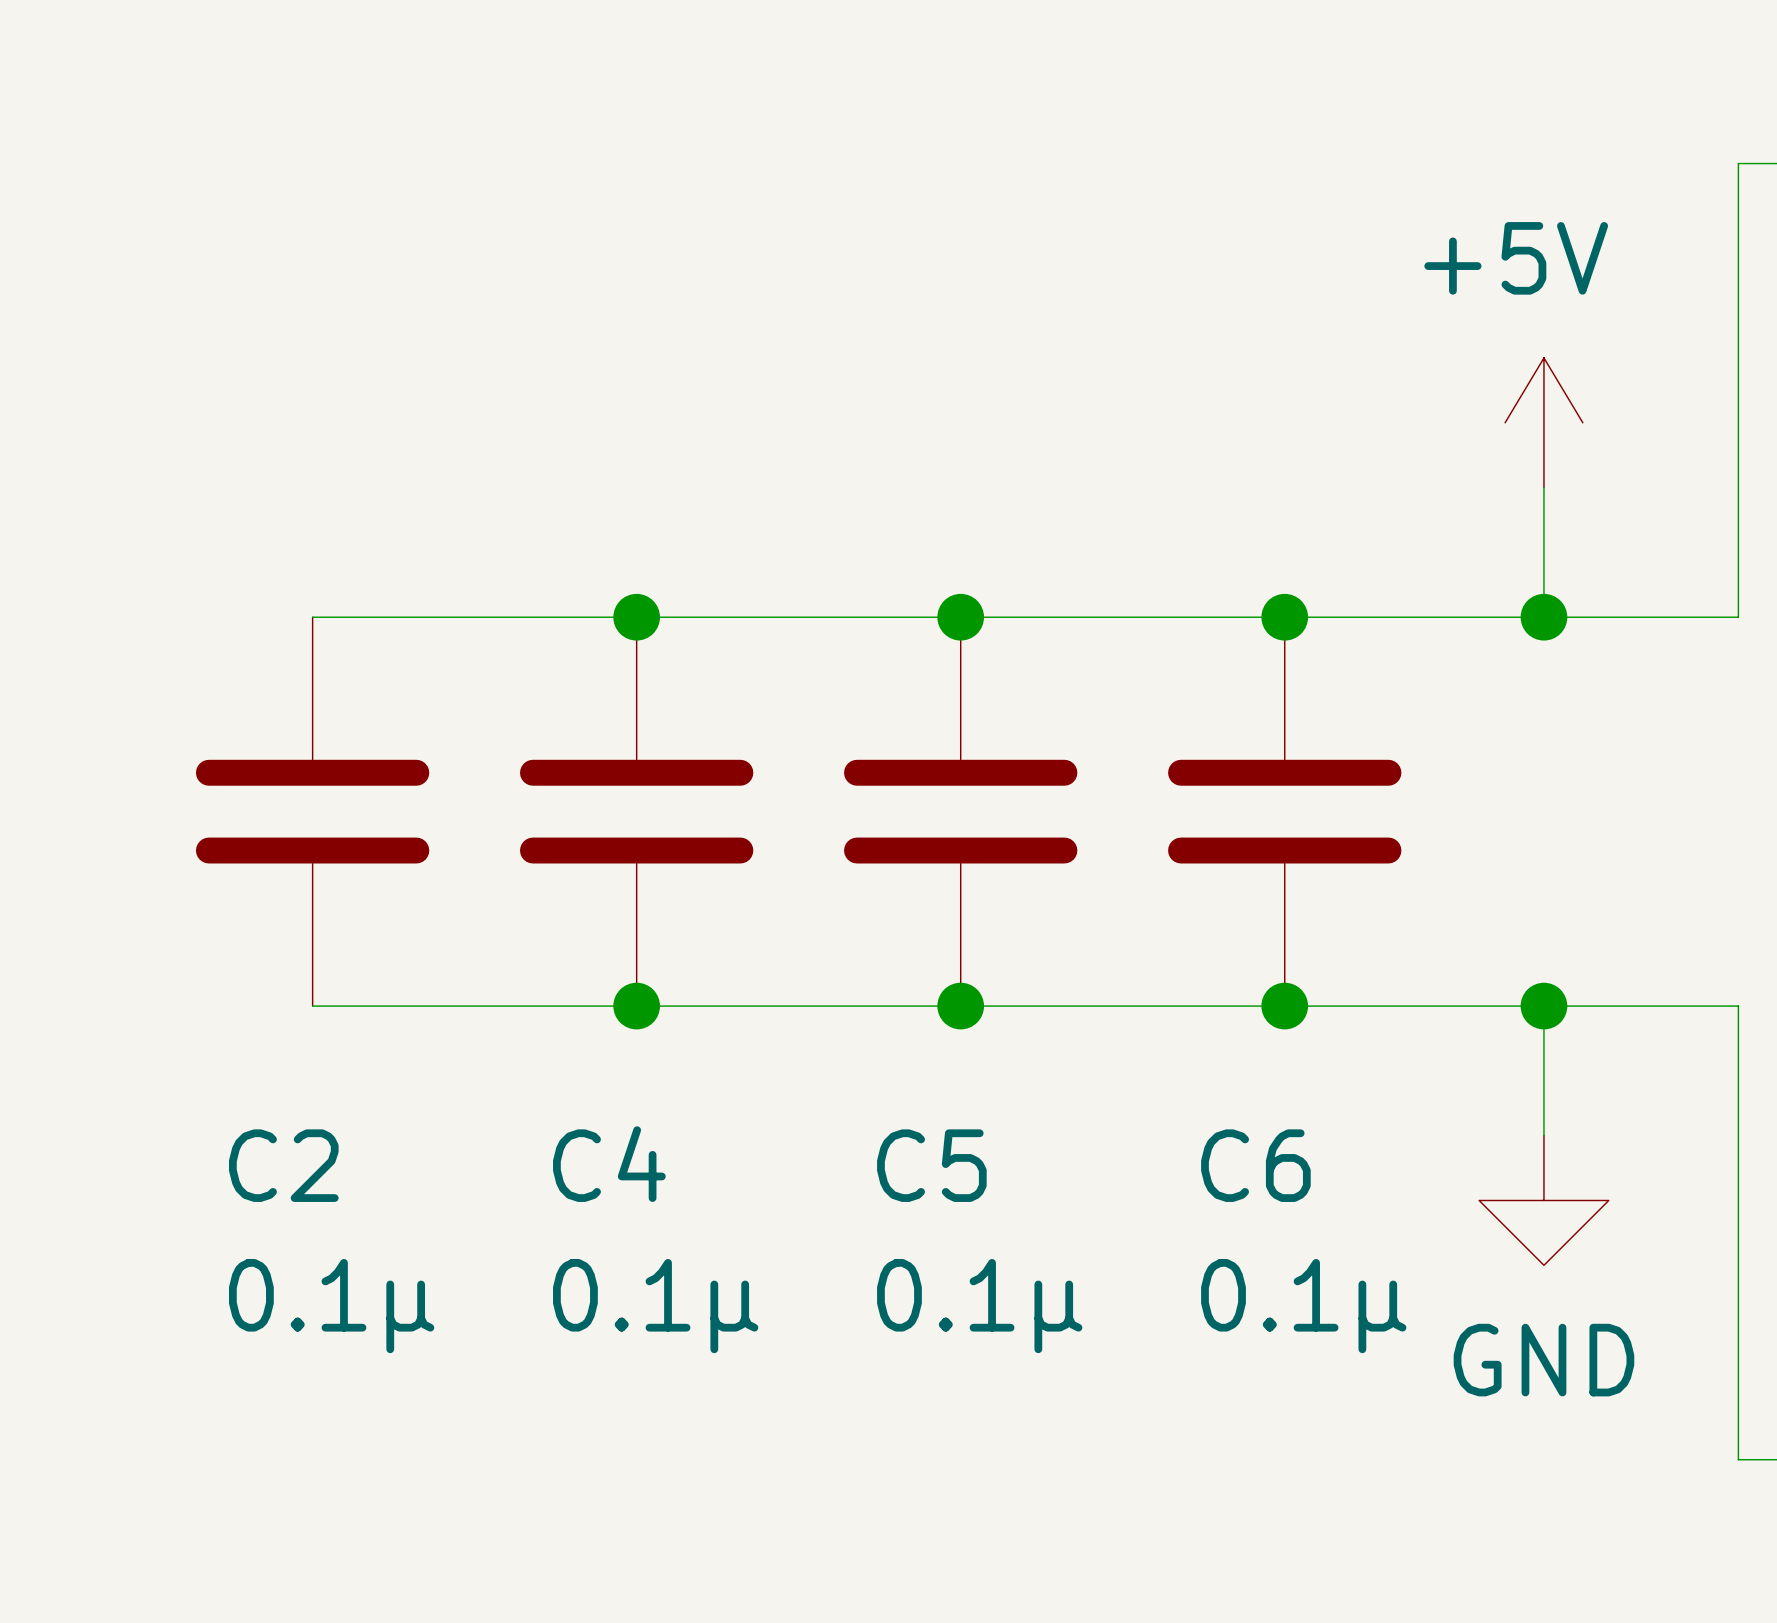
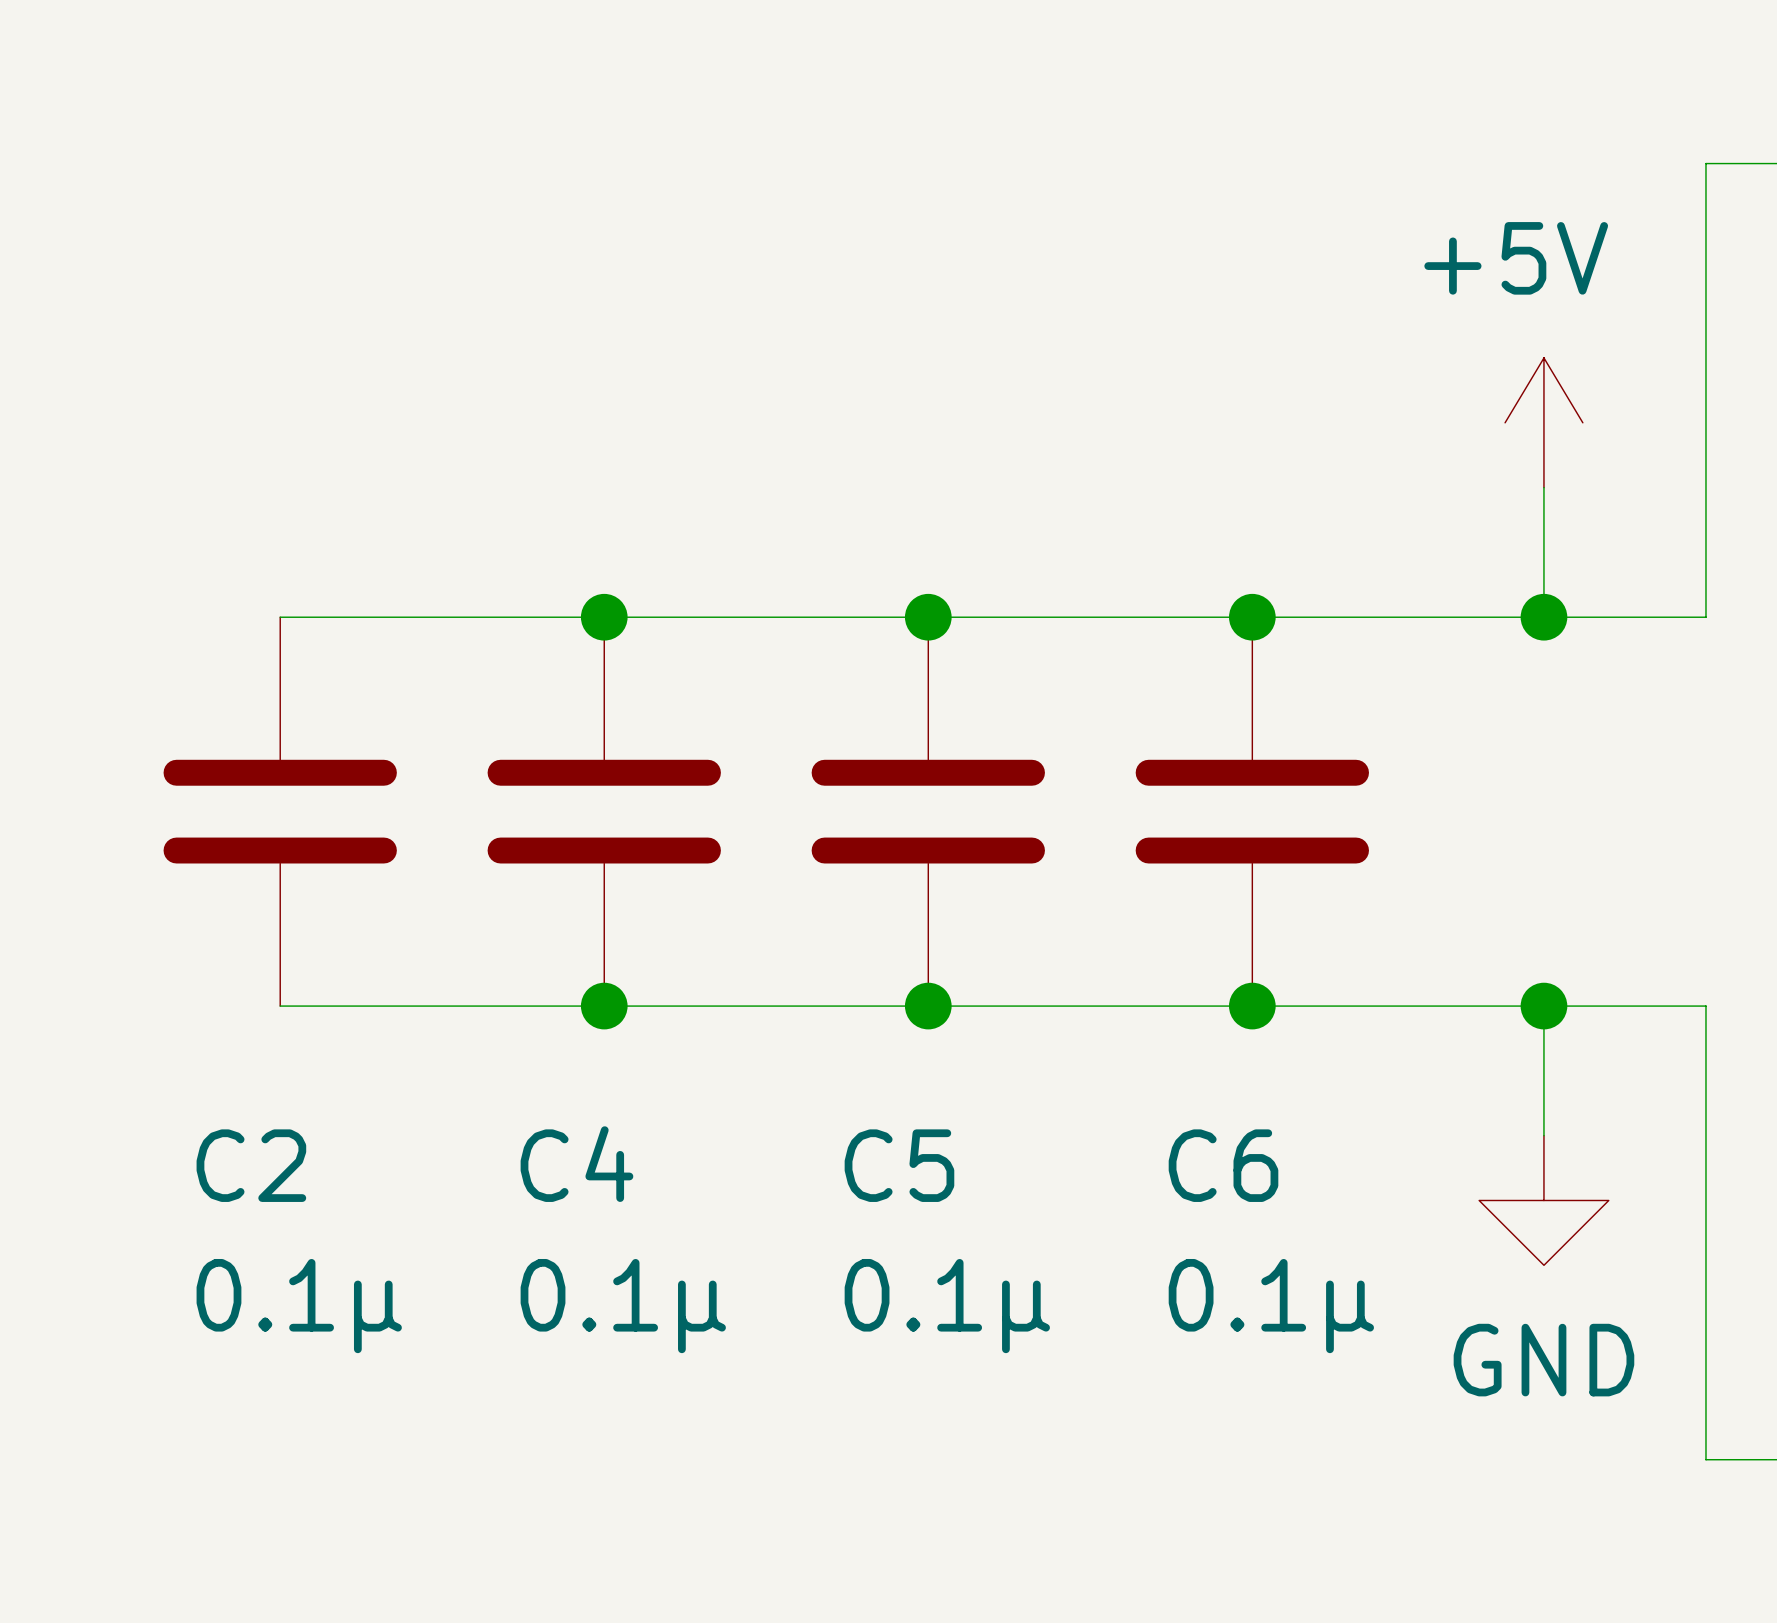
wire: (1738, 163) (1738, 617) (1705, 617) -> (1738, 163) (1705, 163) (1705, 617)
wire: none -> (280, 617) (312, 617)
junction position: (636, 617) -> (604, 617)
junction position: (960, 617) -> (928, 617)
junction position: (1284, 617) -> (1252, 617)
C2 position: (312, 811) -> (280, 811)
C4 position: (636, 811) -> (604, 811)
C5 position: (960, 811) -> (928, 811)
C6 position: (1284, 811) -> (1252, 811)
wire: none -> (280, 1006) (312, 1006)
junction position: (636, 1006) -> (604, 1006)
junction position: (960, 1006) -> (928, 1006)
junction position: (1284, 1006) -> (1252, 1006)
wire: (1705, 1006) (1738, 1006) (1738, 1459) -> (1705, 1006) (1705, 1459) (1738, 1459)

